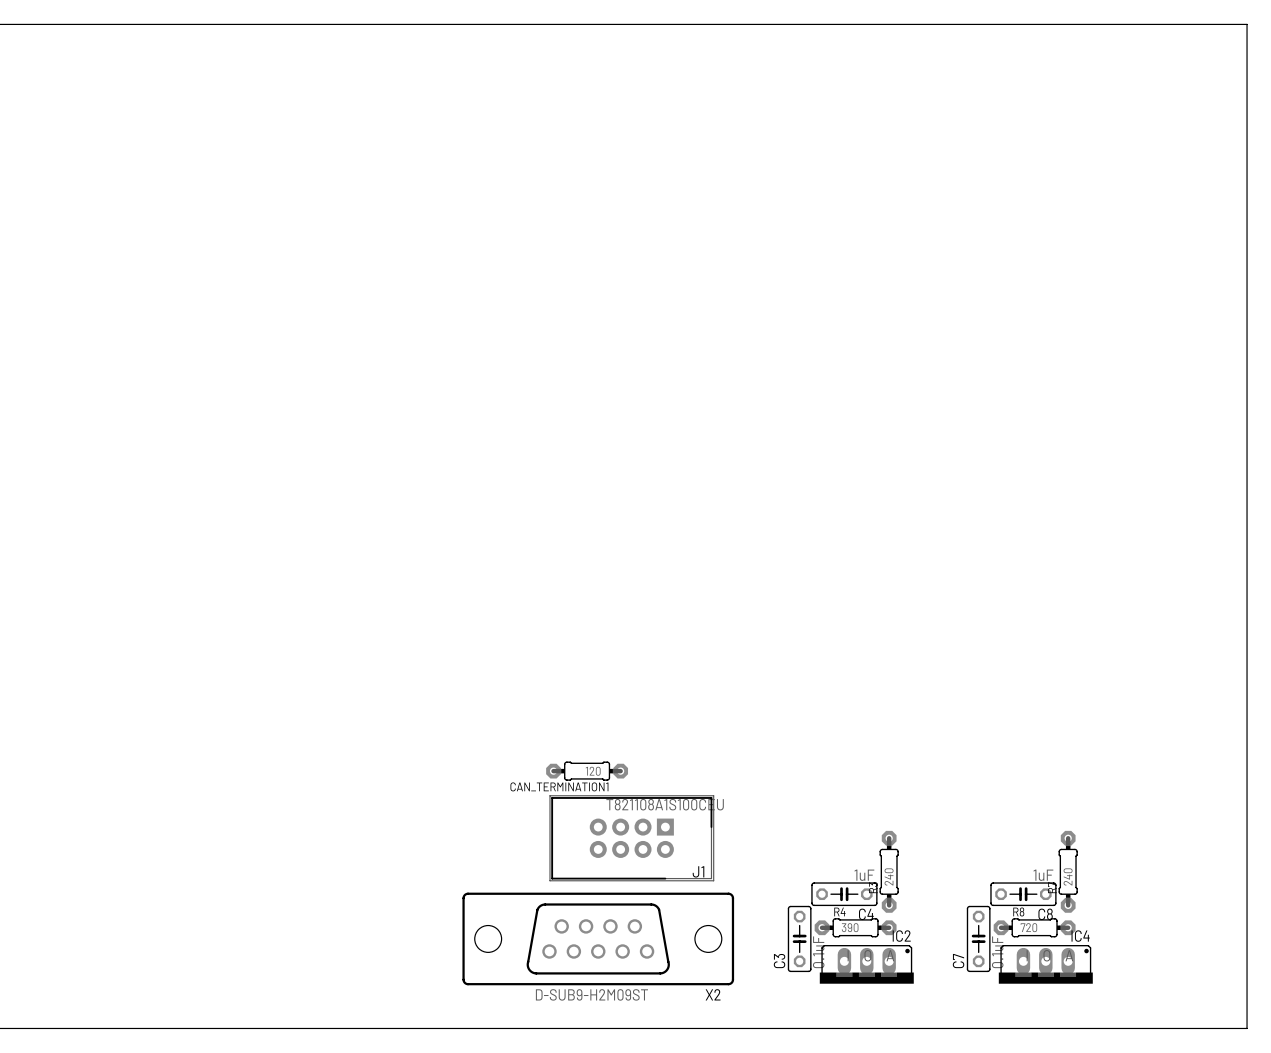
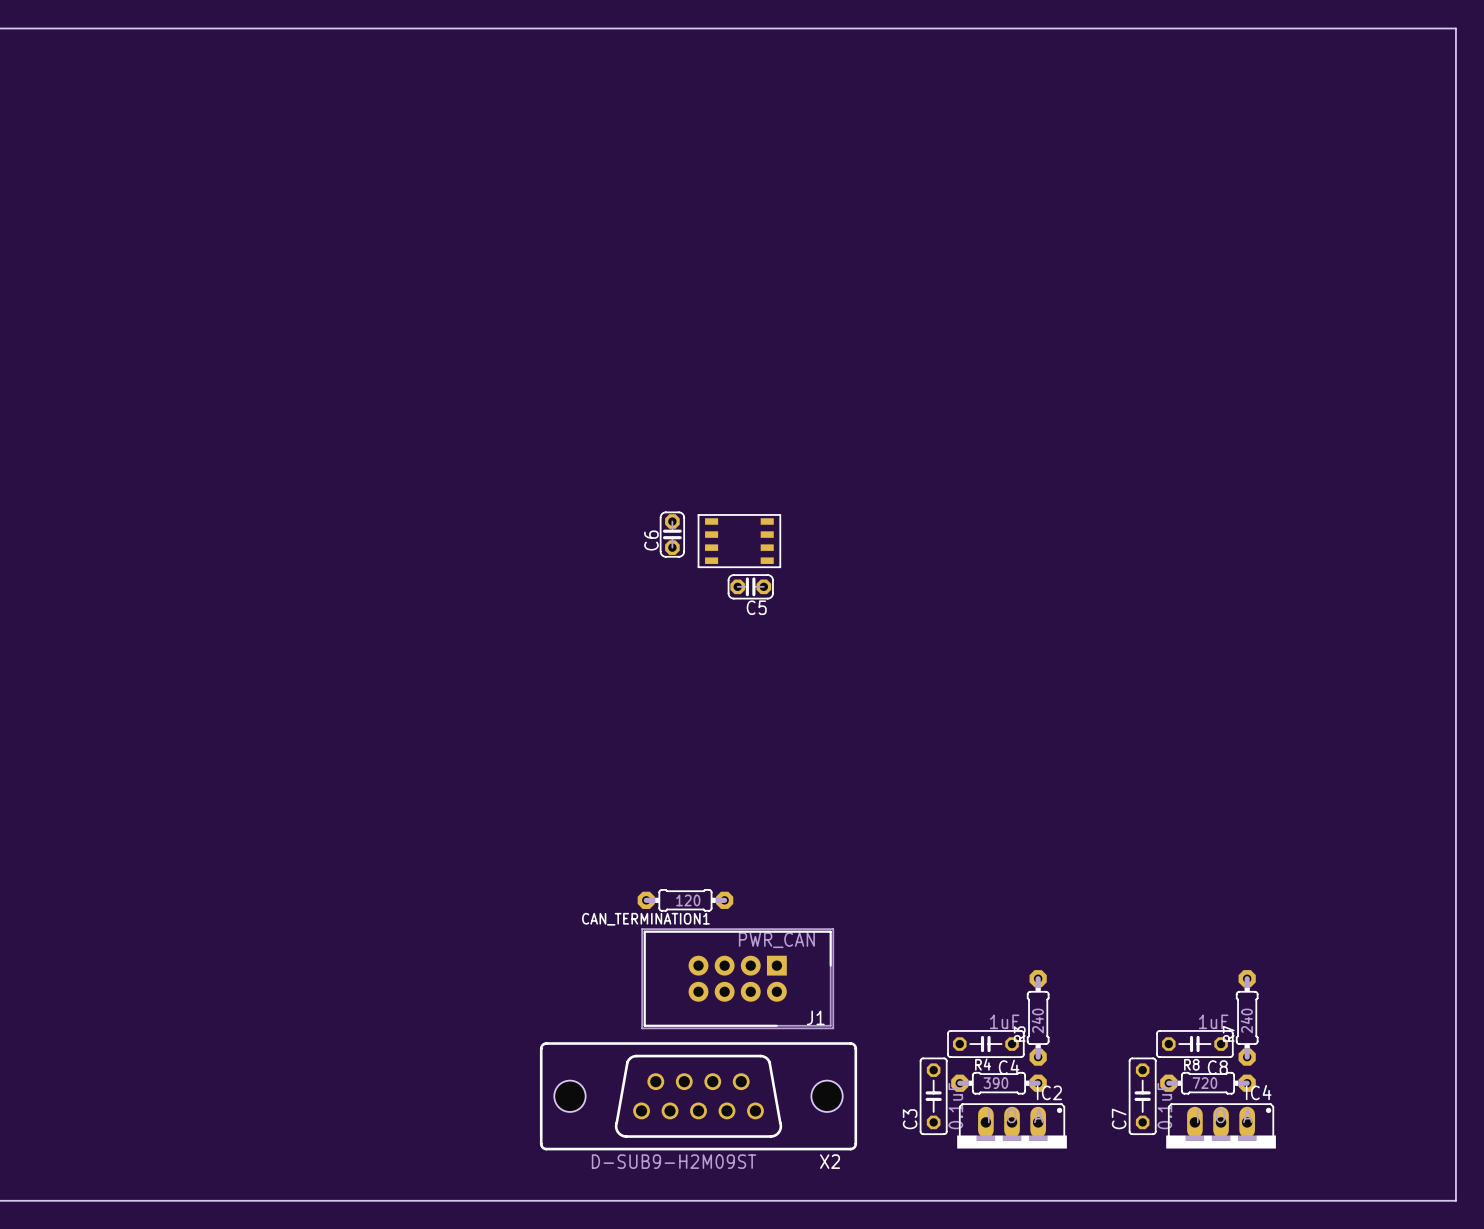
C6: none -> (672, 534)
part: none -> (739, 541)
C5: none -> (750, 586)
J1 value: T821108A1S100CEU (665, 804) -> PWR_CAN (776, 940)

